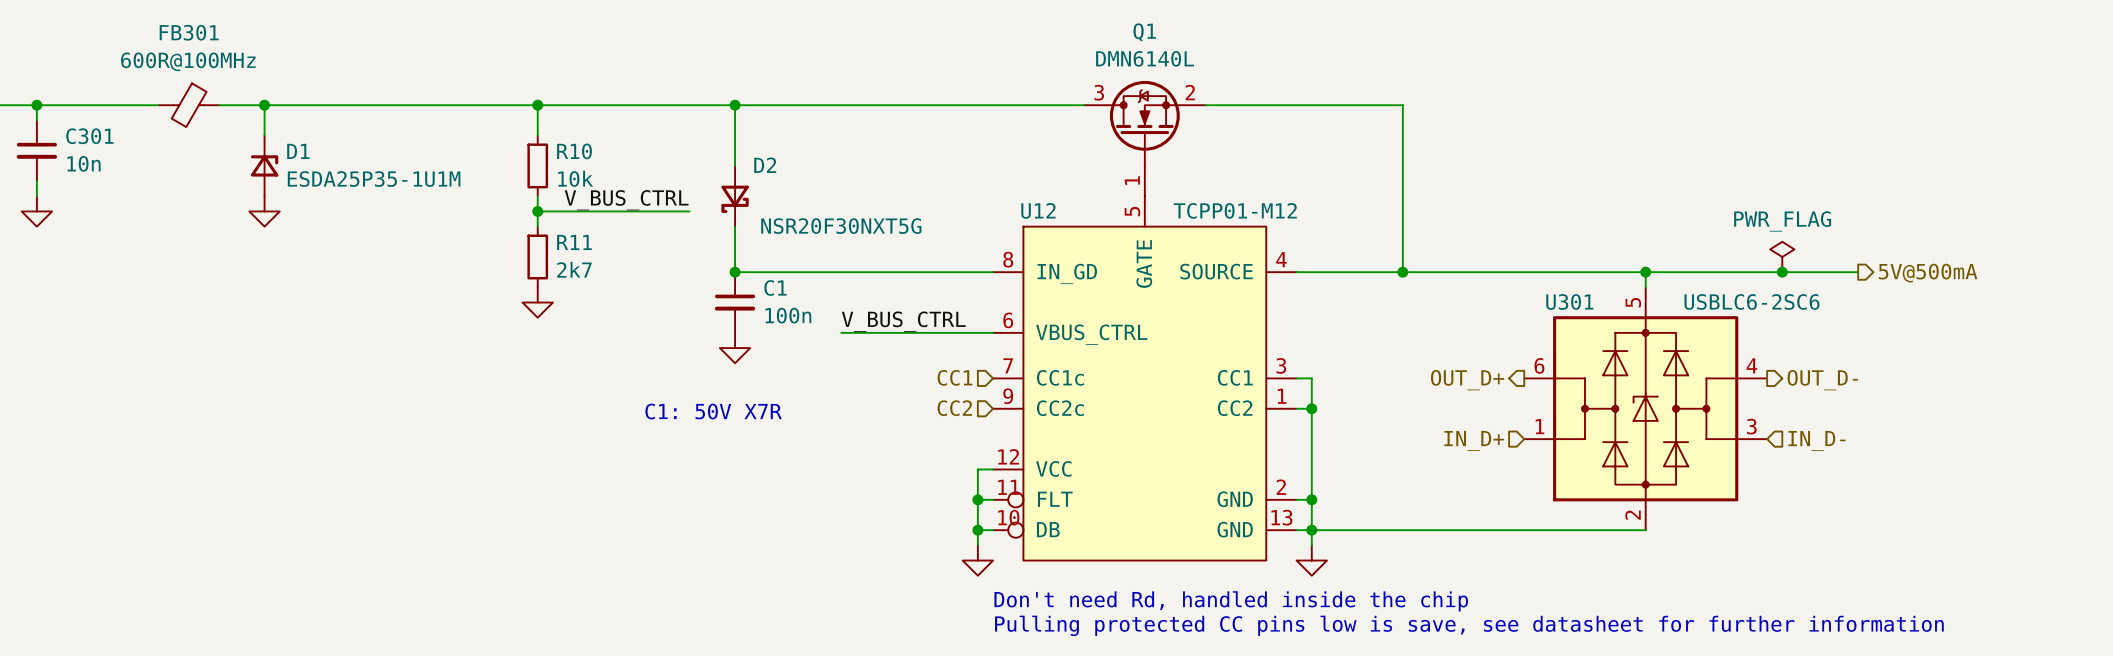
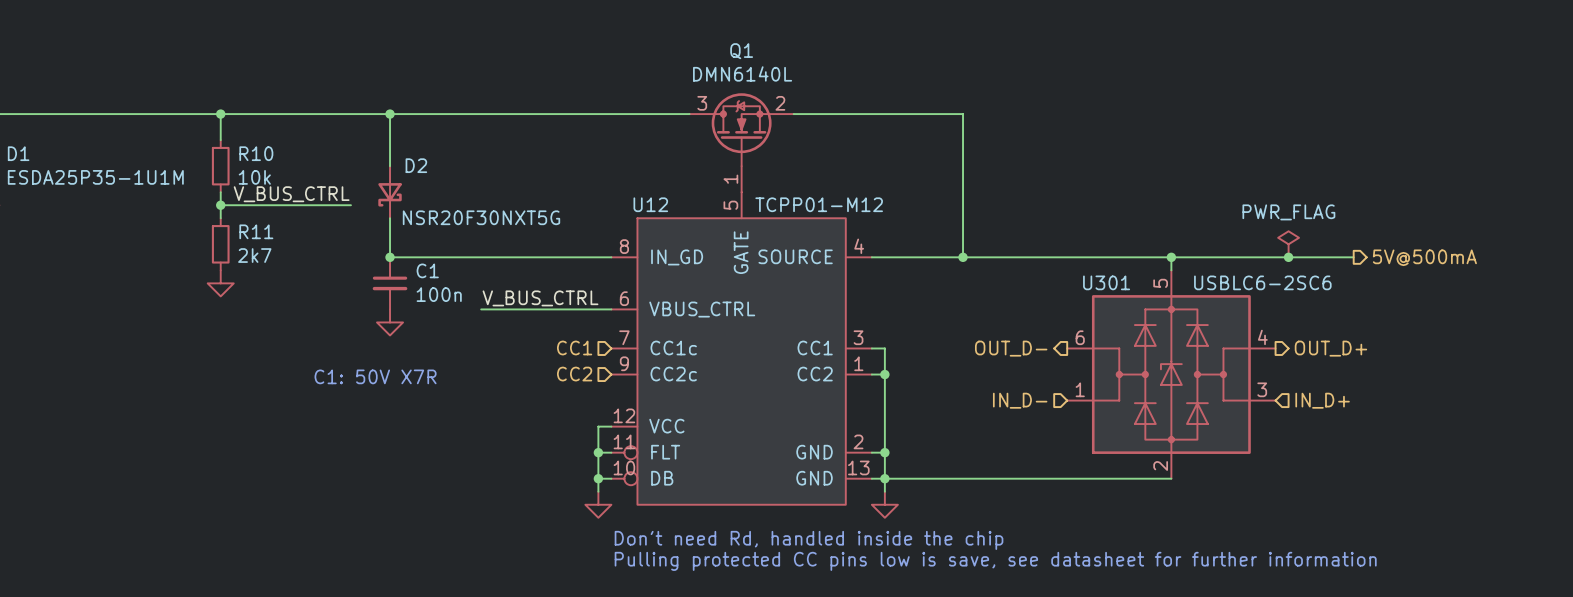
hierarchical label: OUT_D+ (1467, 380) -> OUT_D- (1011, 348)
hierarchical label: OUT_D- (1822, 380) -> OUT_D+ (1330, 348)
hierarchical label: IN_D+ (1474, 441) -> IN_D- (1020, 400)
hierarchical label: IN_D- (1816, 441) -> IN_D+ (1322, 400)

